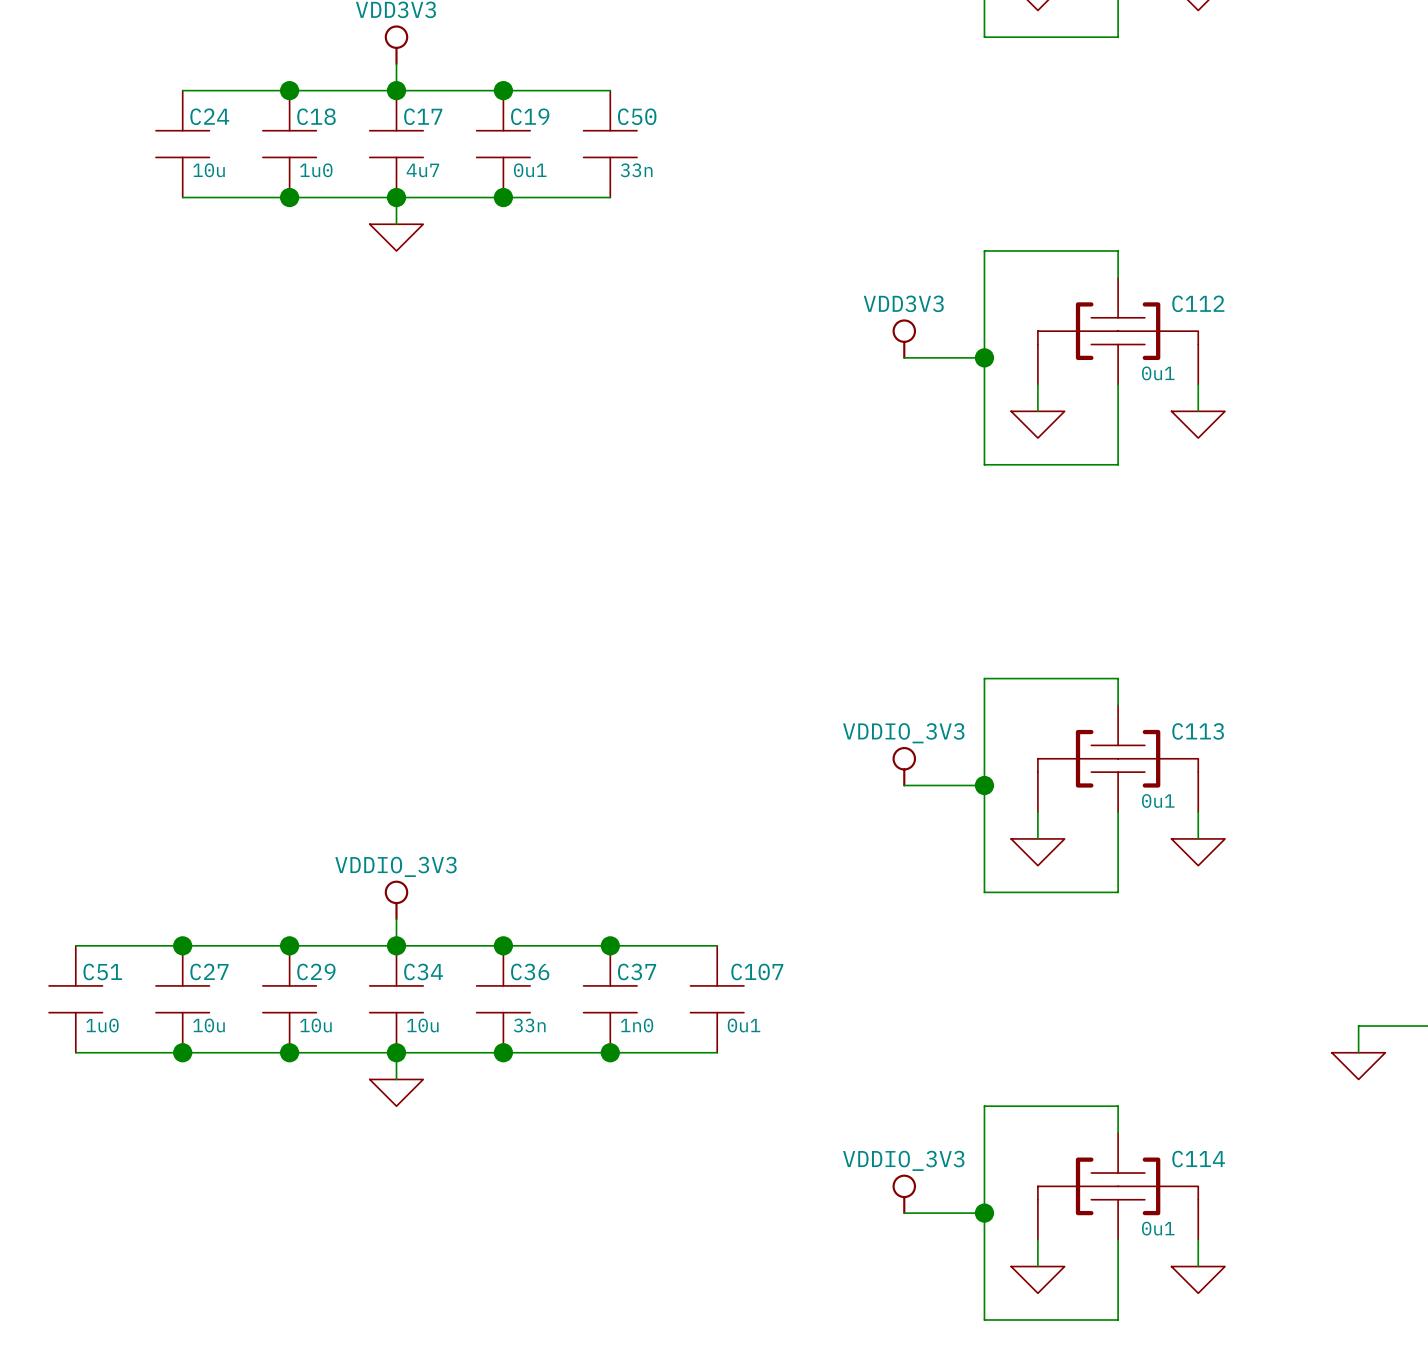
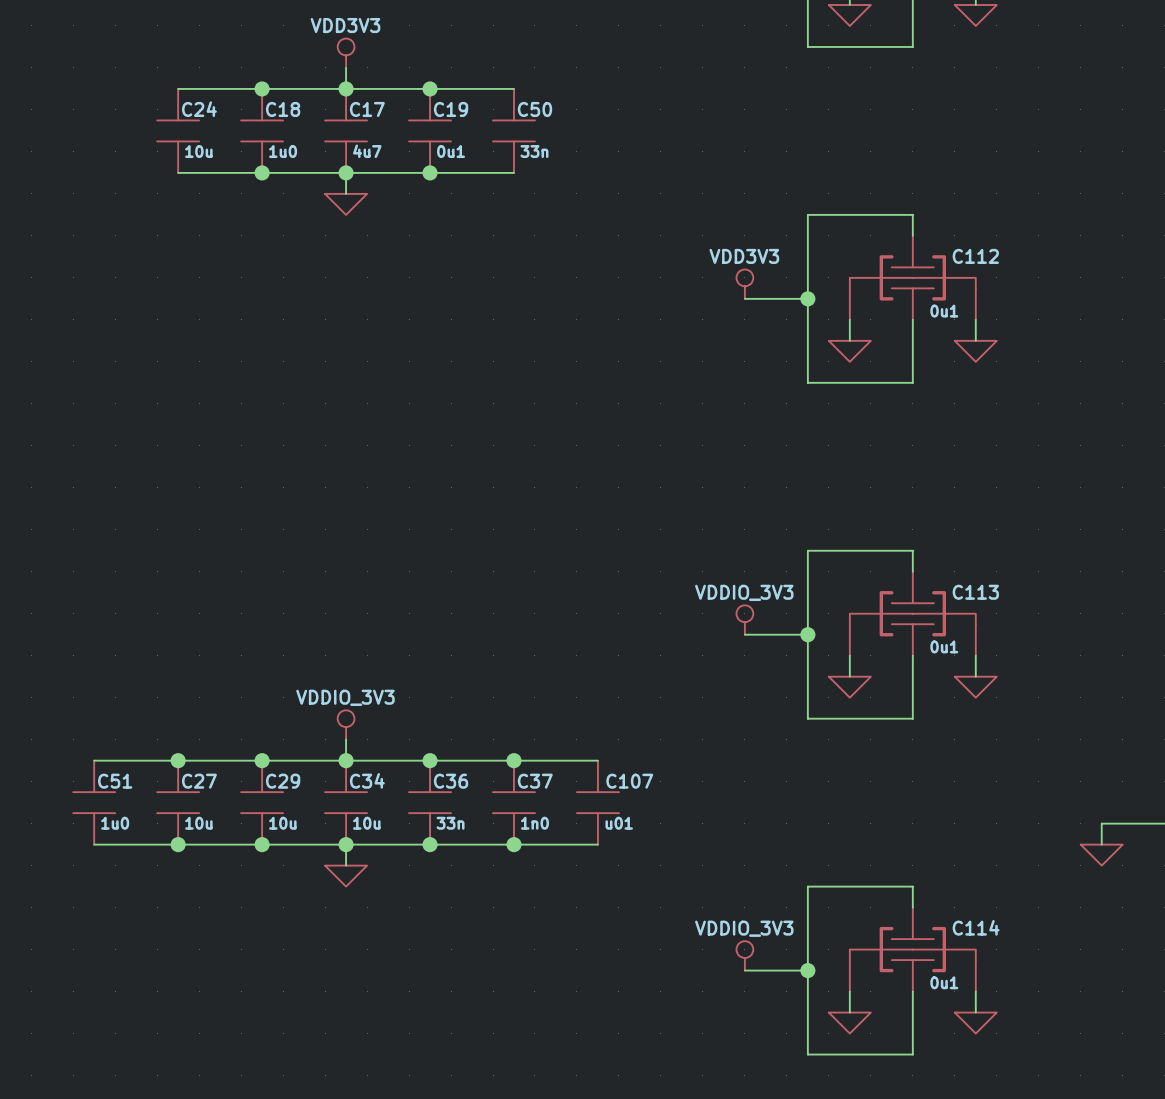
C107 value: 0u1 (744, 1025) -> u01 (619, 823)

